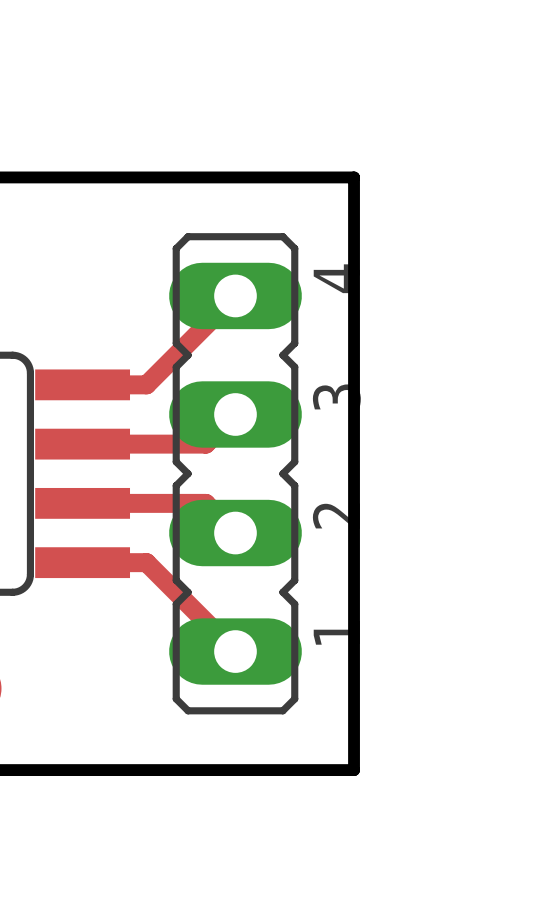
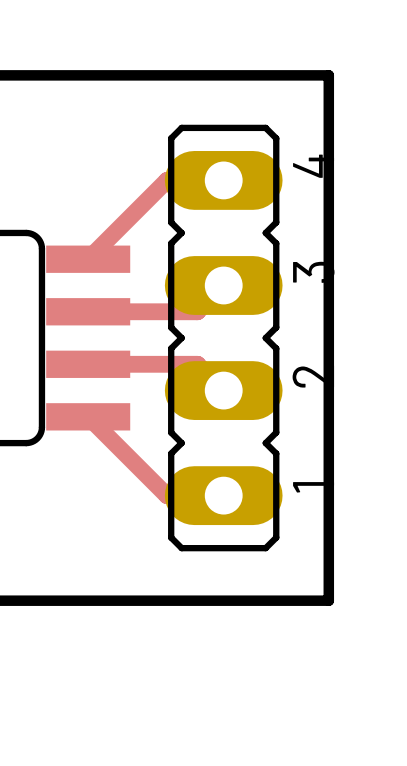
track: (235, 295) (146, 384) (82, 384) -> (223, 180) (166, 180) (88, 259)
track: (82, 562) (146, 562) (235, 651) -> (88, 416) (166, 495) (223, 495)

